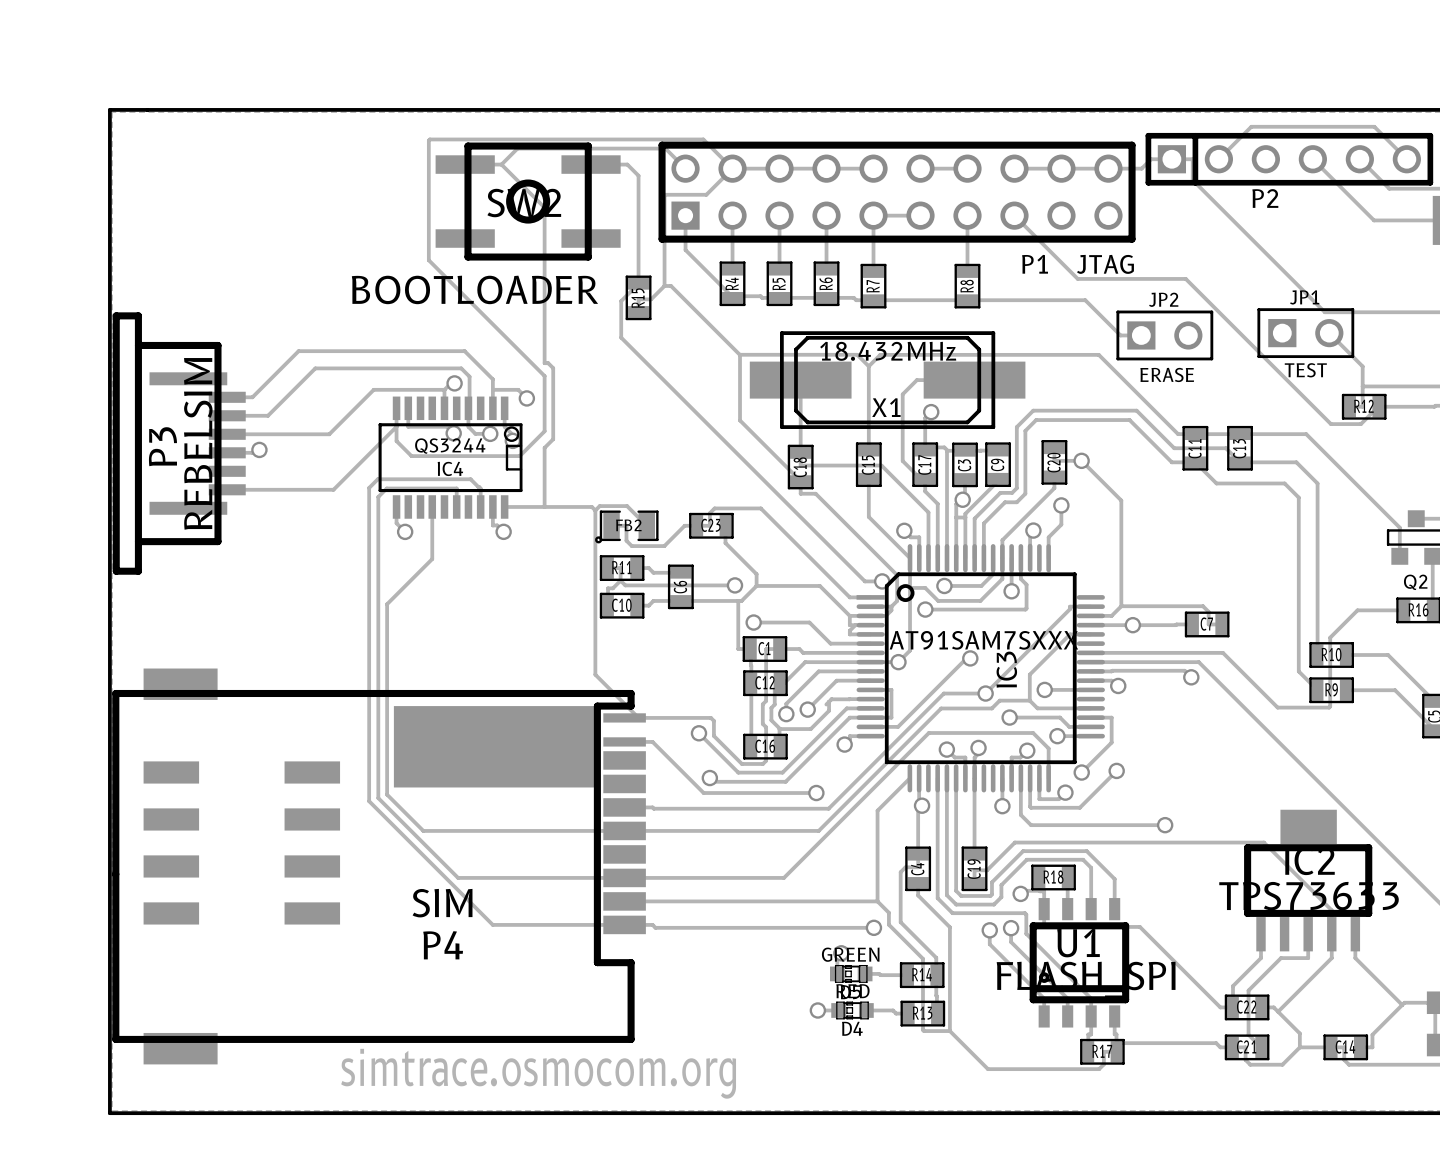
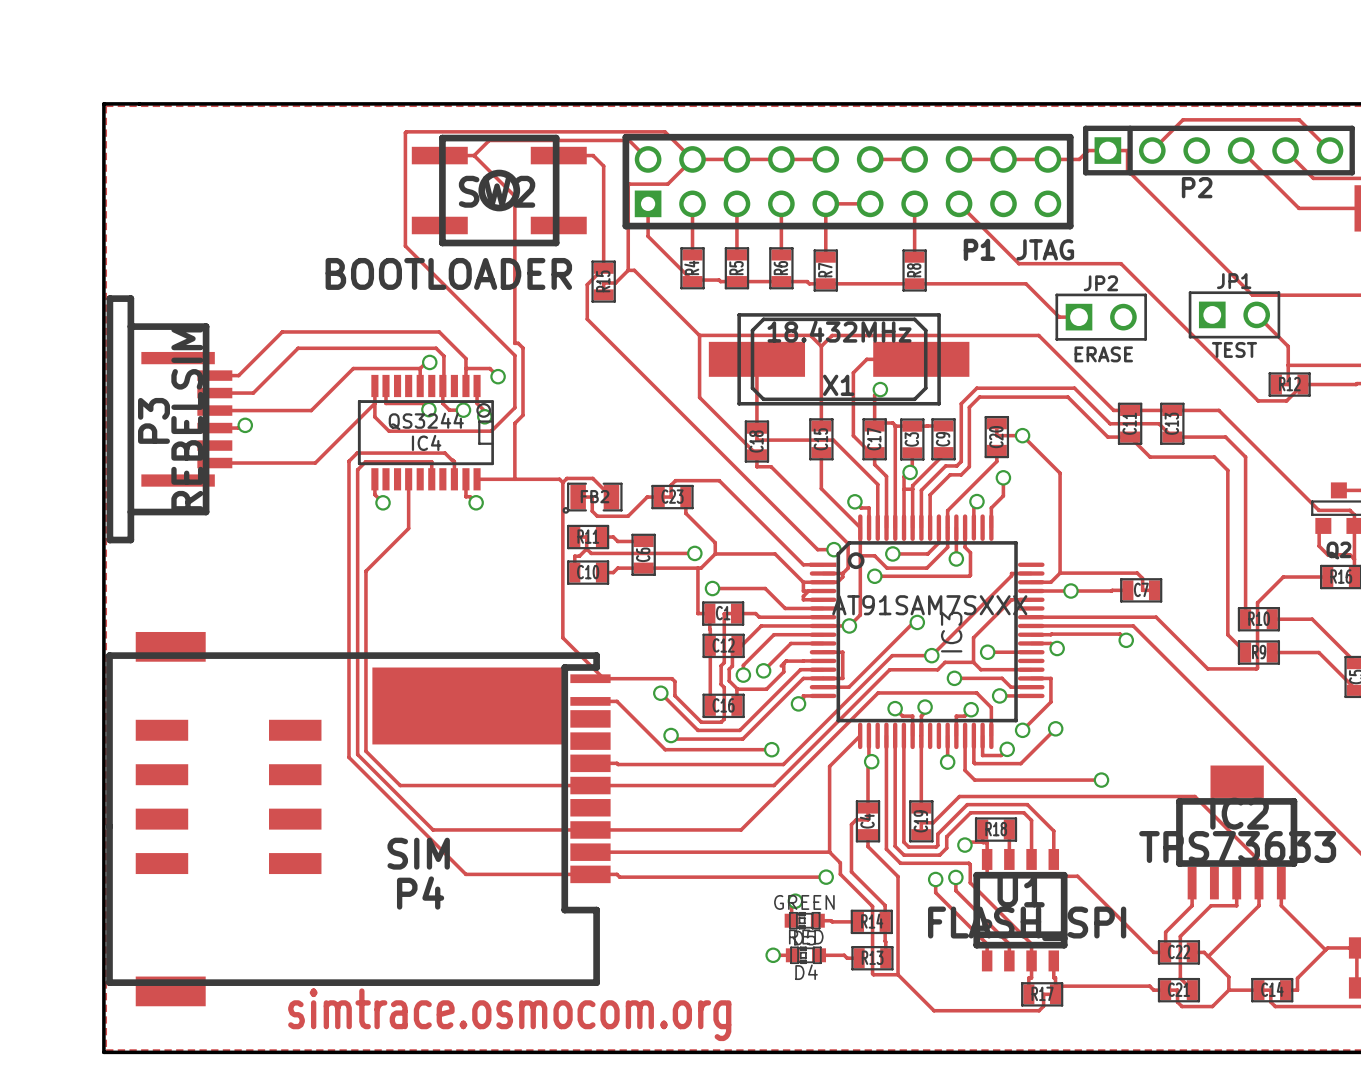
track: (1289, 434) (1306, 434) (1399, 527) (1399, 556) -> (1218, 410) (1318, 510) (1349, 510) (1354, 514) (1354, 525)
track: none -> (1319, 529) (1319, 546) (1327, 554) (1349, 554) (1354, 559)

